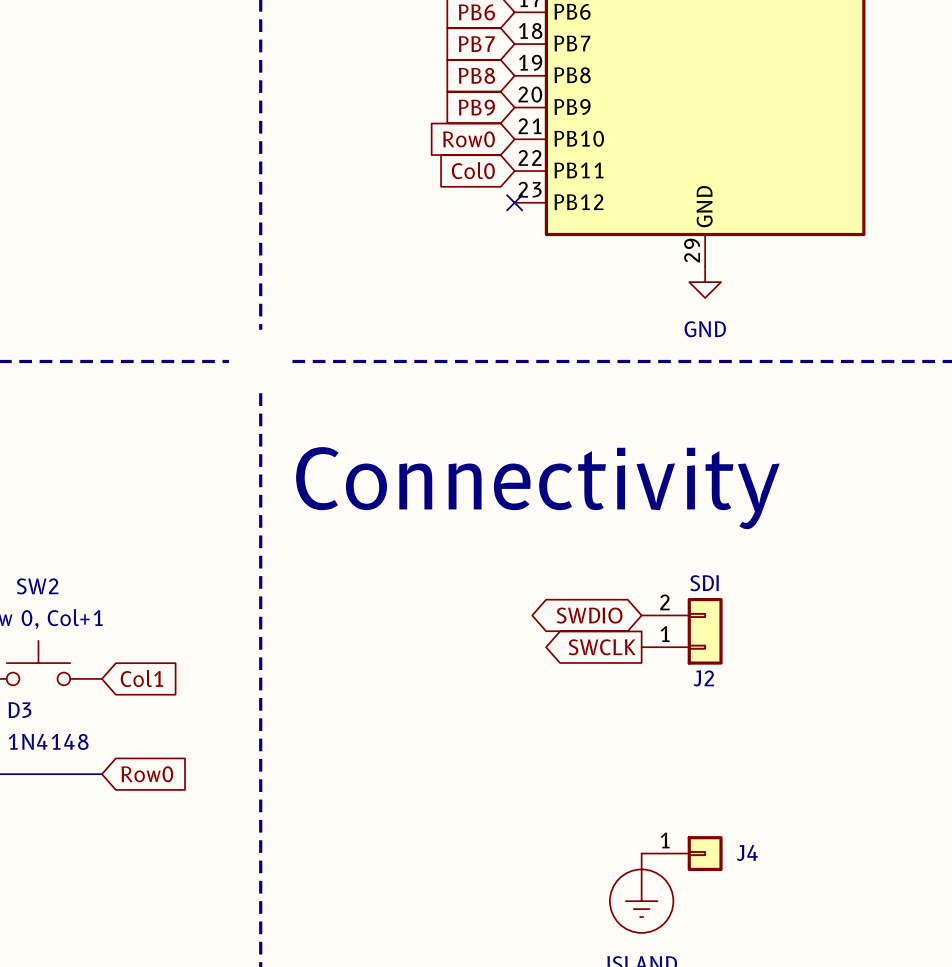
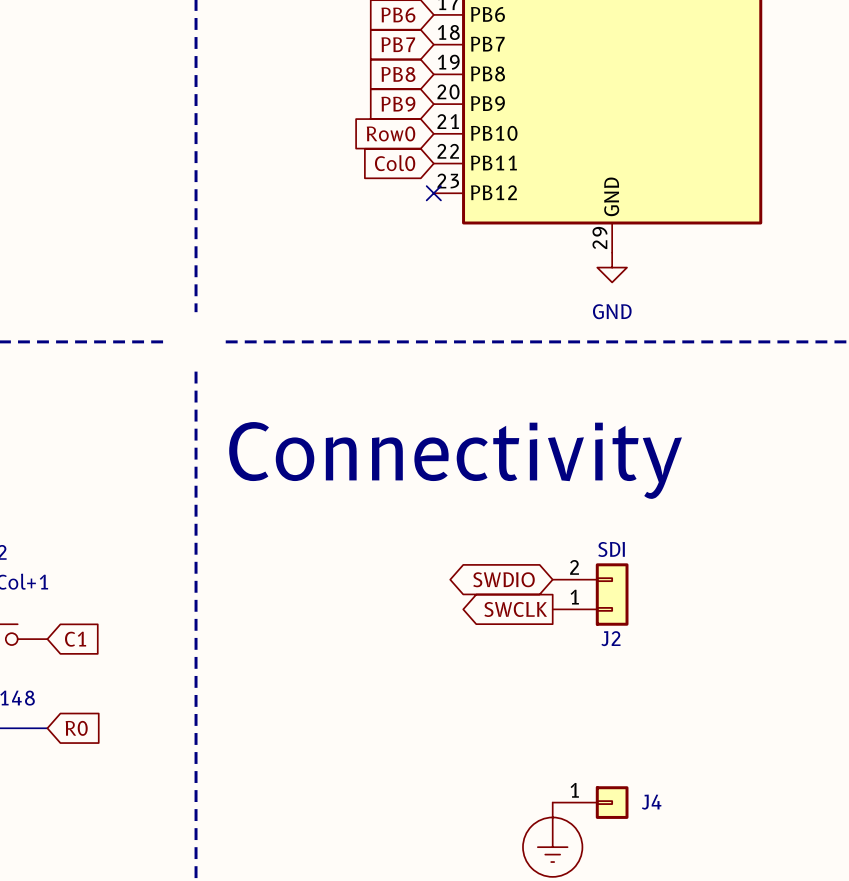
global label: Col1 (141, 678) -> C1 (75, 639)
global label: Row0 (147, 774) -> R0 (76, 728)

